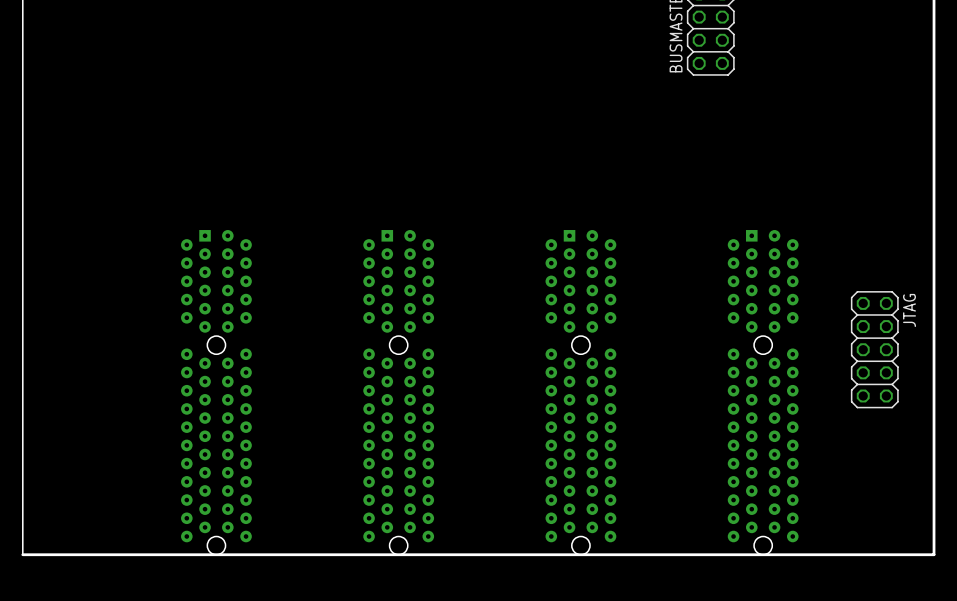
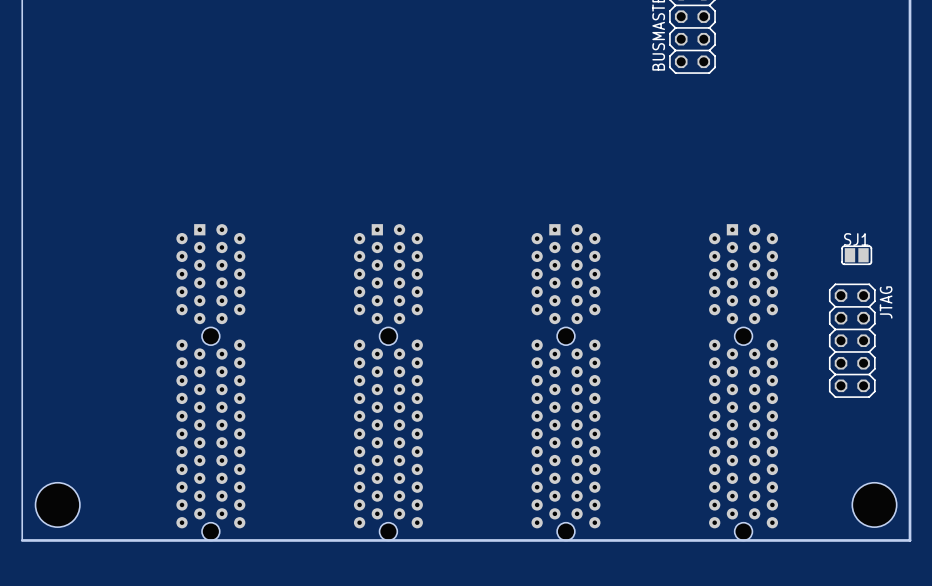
SJ1: none -> (856, 255)
hole: none -> (57, 504)
hole: none -> (874, 504)

